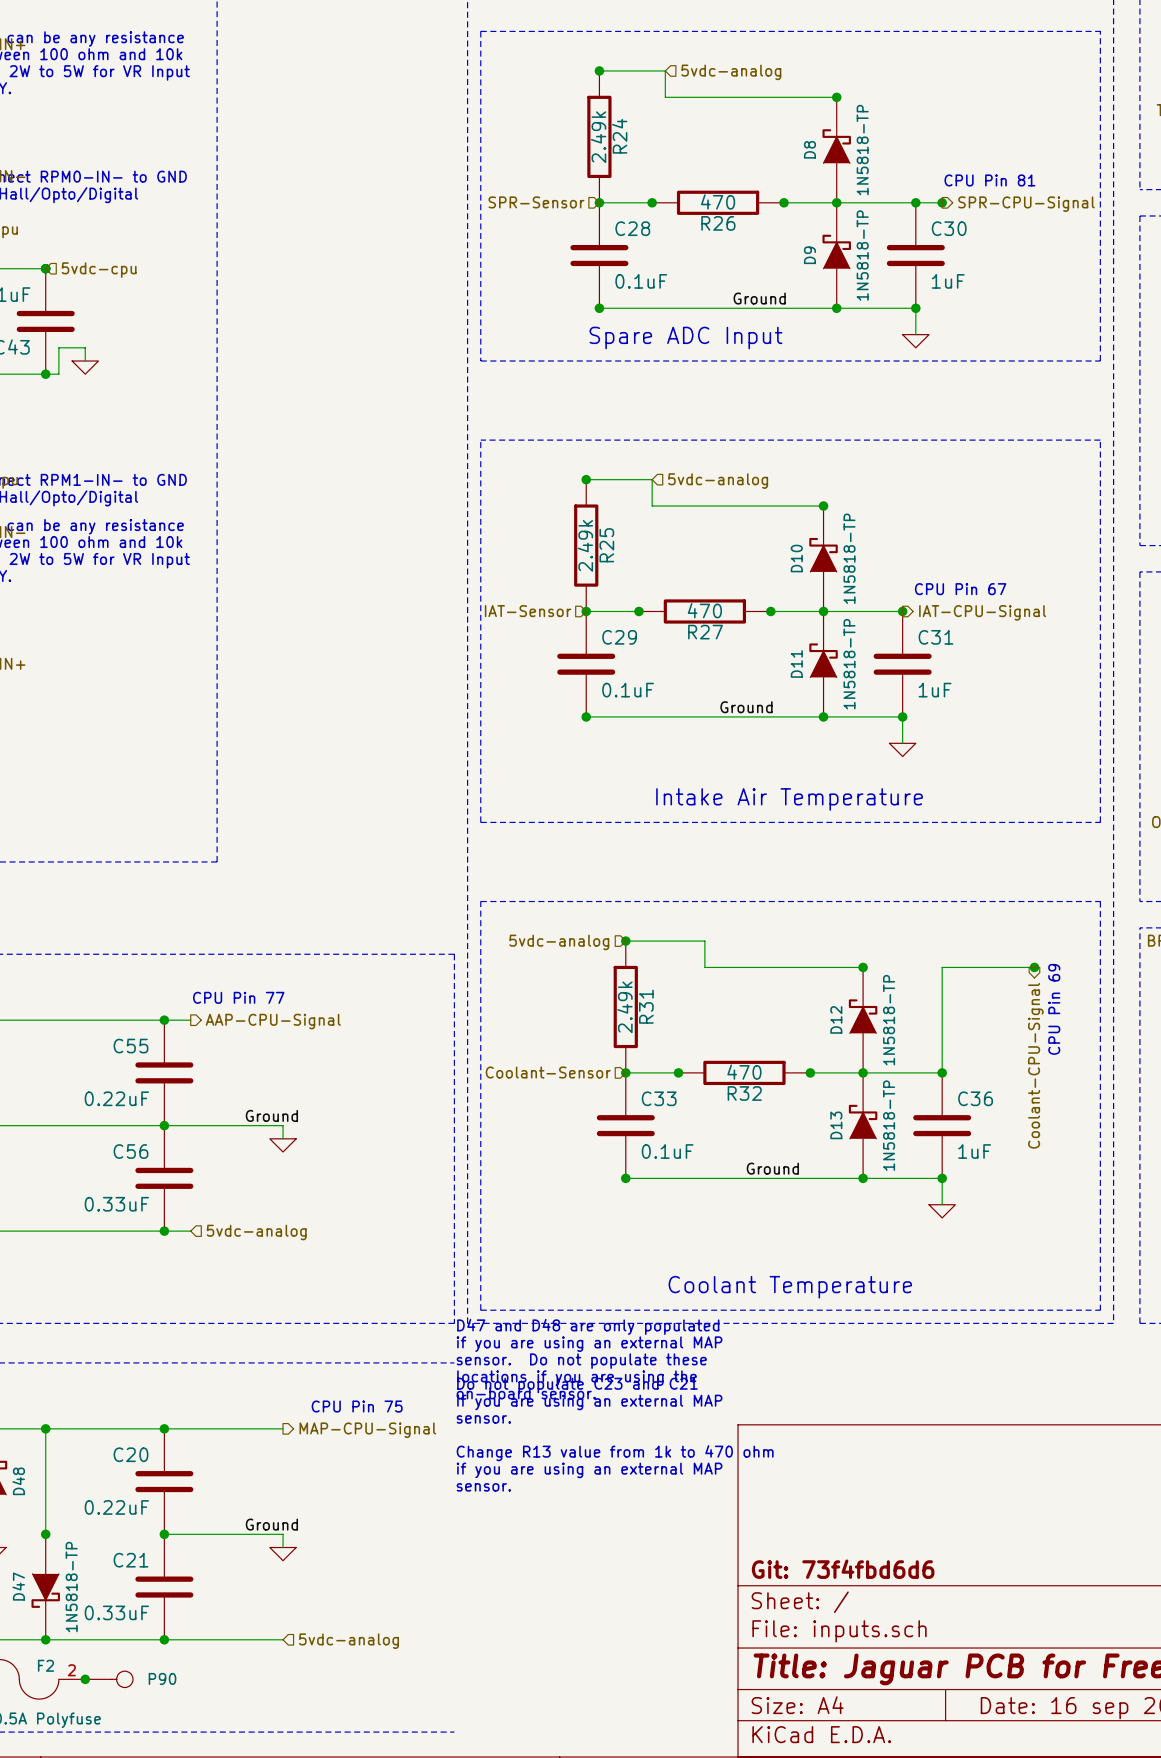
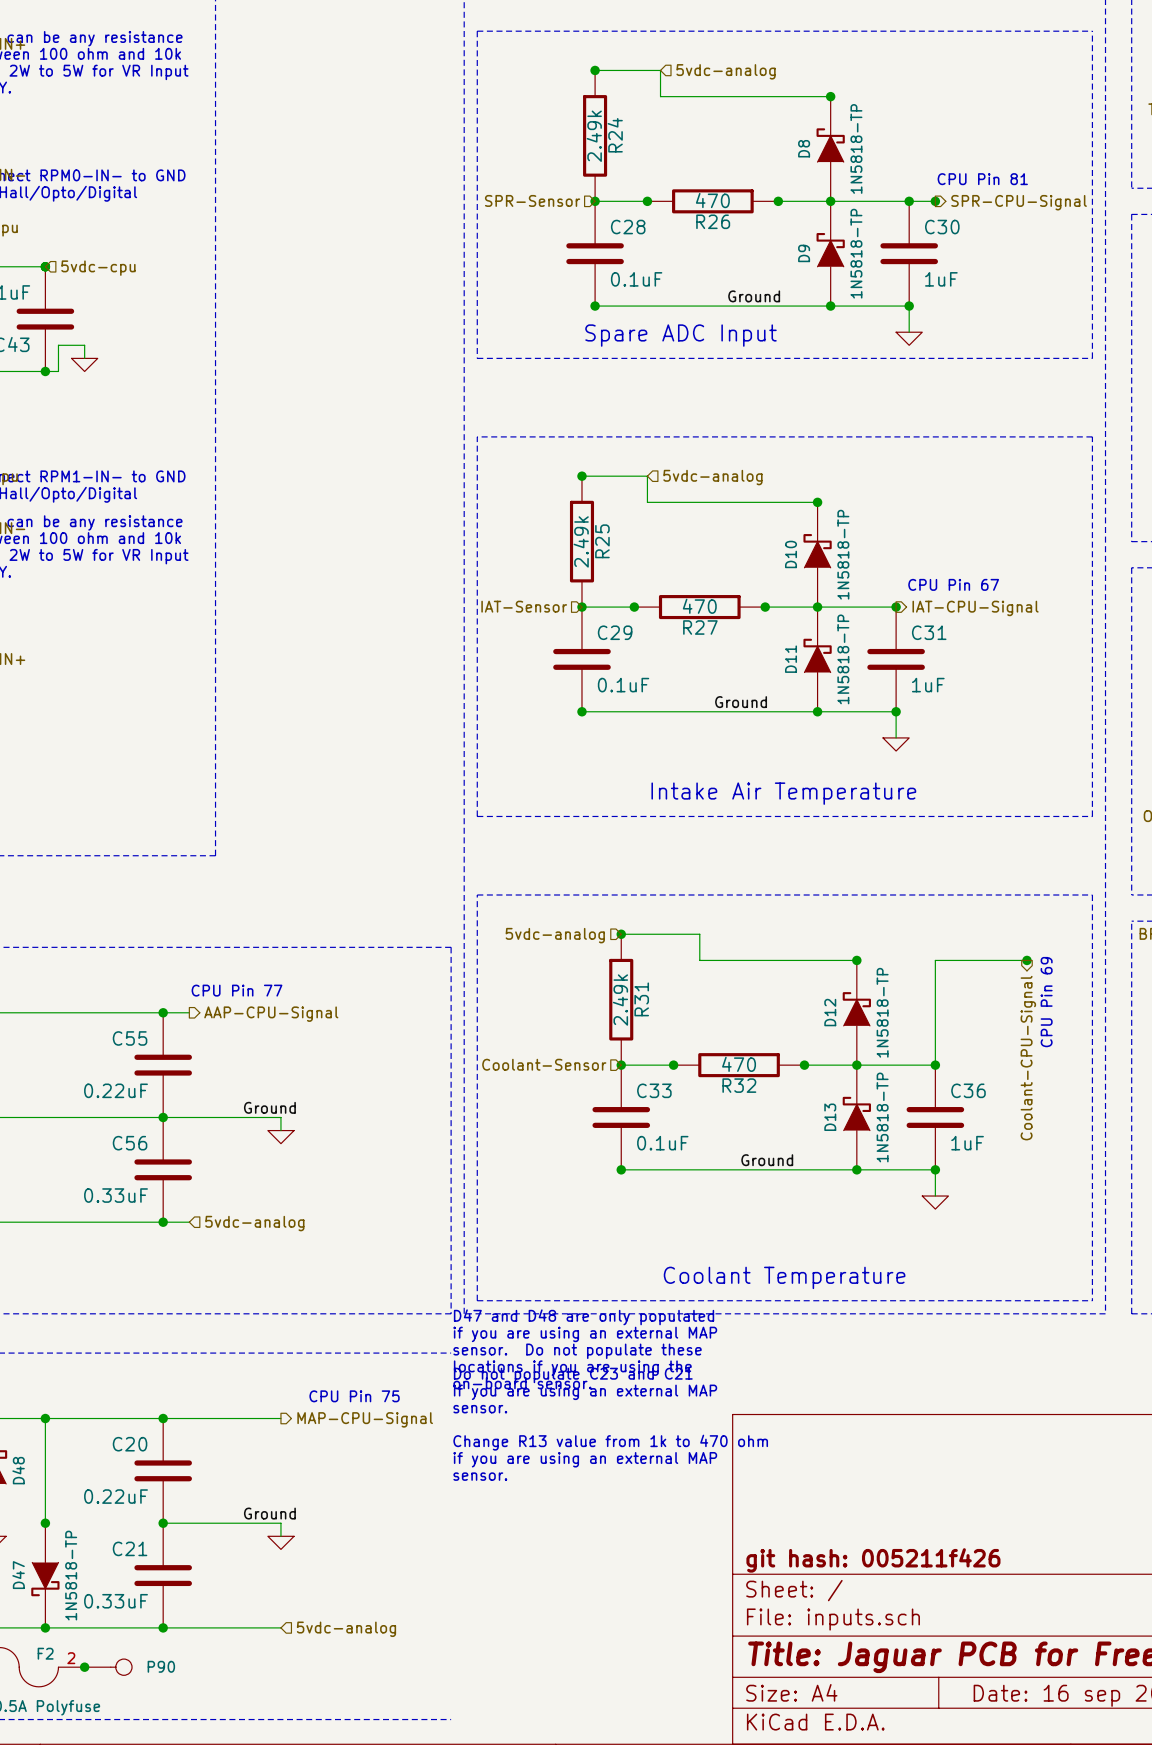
title block: Git: 73f4fbd6d6 (843, 1569) -> git hash: 005211f426 (873, 1560)

